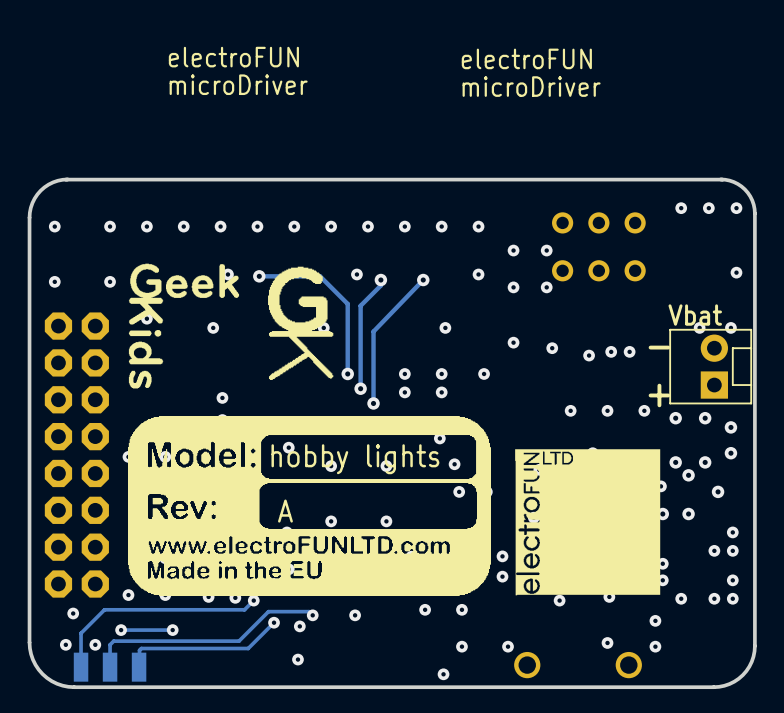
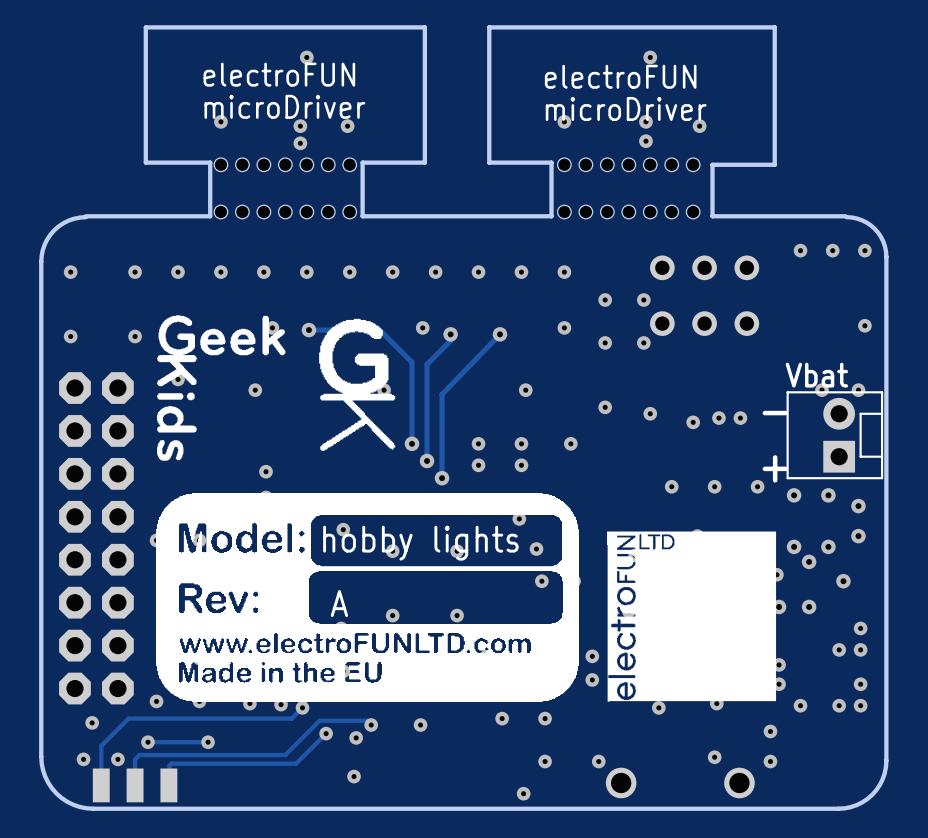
via: none -> (306, 57)
via: none -> (650, 57)
via: none -> (220, 121)
via: none -> (564, 121)
via: none -> (645, 121)
via: none -> (300, 126)
via: none -> (347, 126)
via: none -> (699, 126)
via: none -> (645, 141)
via: none -> (300, 143)
hole: none -> (220, 164)
hole: none -> (242, 164)
hole: none -> (263, 164)
hole: none -> (285, 164)
hole: none -> (306, 164)
hole: none -> (328, 164)
hole: none -> (349, 164)
hole: none -> (564, 164)
hole: none -> (585, 164)
hole: none -> (607, 164)
hole: none -> (628, 164)
hole: none -> (650, 164)
hole: none -> (671, 164)
hole: none -> (693, 164)
hole: none -> (220, 212)
hole: none -> (242, 212)
hole: none -> (263, 212)
hole: none -> (285, 212)
hole: none -> (306, 212)
hole: none -> (328, 212)
hole: none -> (349, 212)
hole: none -> (564, 212)
hole: none -> (585, 212)
hole: none -> (607, 212)
hole: none -> (628, 212)
hole: none -> (650, 212)
hole: none -> (671, 212)
hole: none -> (693, 212)
board edge: none -> (845, 216) (712, 216) (712, 164) (774, 164) (774, 27) (489, 27) (489, 162) (551, 162) (551, 216) (362, 216) (362, 162) (424, 162) (424, 27) (145, 27) (145, 162) (210, 162) (210, 216) (85, 216)
board edge: (722, 179) (65, 179) -> none

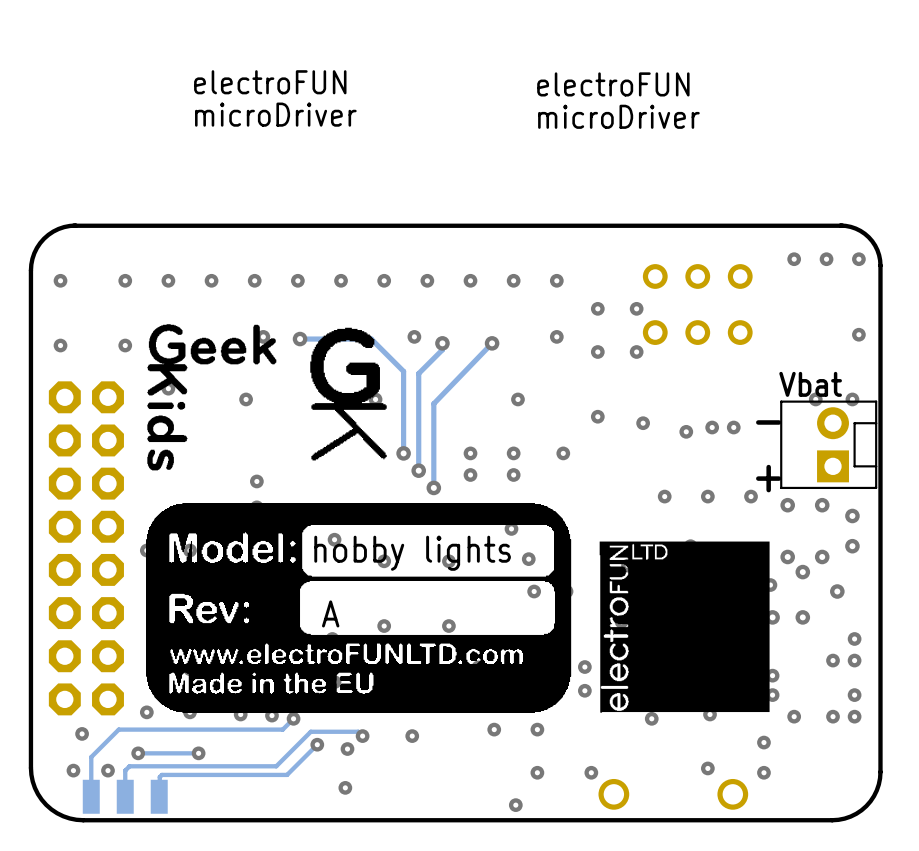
via: (306, 57) -> none
via: (650, 57) -> none
via: (220, 121) -> none
via: (564, 121) -> none
via: (645, 121) -> none
via: (300, 126) -> none
via: (347, 126) -> none
via: (699, 126) -> none
via: (645, 141) -> none
via: (300, 143) -> none
hole: (220, 164) -> none
hole: (242, 164) -> none
hole: (263, 164) -> none
hole: (285, 164) -> none
hole: (306, 164) -> none
hole: (328, 164) -> none
hole: (349, 164) -> none
hole: (564, 164) -> none
hole: (585, 164) -> none
hole: (607, 164) -> none
hole: (628, 164) -> none
hole: (650, 164) -> none
hole: (671, 164) -> none
hole: (693, 164) -> none
hole: (220, 212) -> none
hole: (242, 212) -> none
hole: (263, 212) -> none
hole: (285, 212) -> none
hole: (306, 212) -> none
hole: (328, 212) -> none
hole: (349, 212) -> none
hole: (564, 212) -> none
hole: (585, 212) -> none
hole: (607, 212) -> none
hole: (628, 212) -> none
hole: (650, 212) -> none
hole: (671, 212) -> none
hole: (693, 212) -> none
board edge: (845, 216) (712, 216) (712, 164) (774, 164) (774, 27) (489, 27) (489, 162) (551, 162) (551, 216) (362, 216) (362, 162) (424, 162) (424, 27) (145, 27) (145, 162) (210, 162) (210, 216) (85, 216) -> none
board edge: none -> (842, 225) (73, 225)

